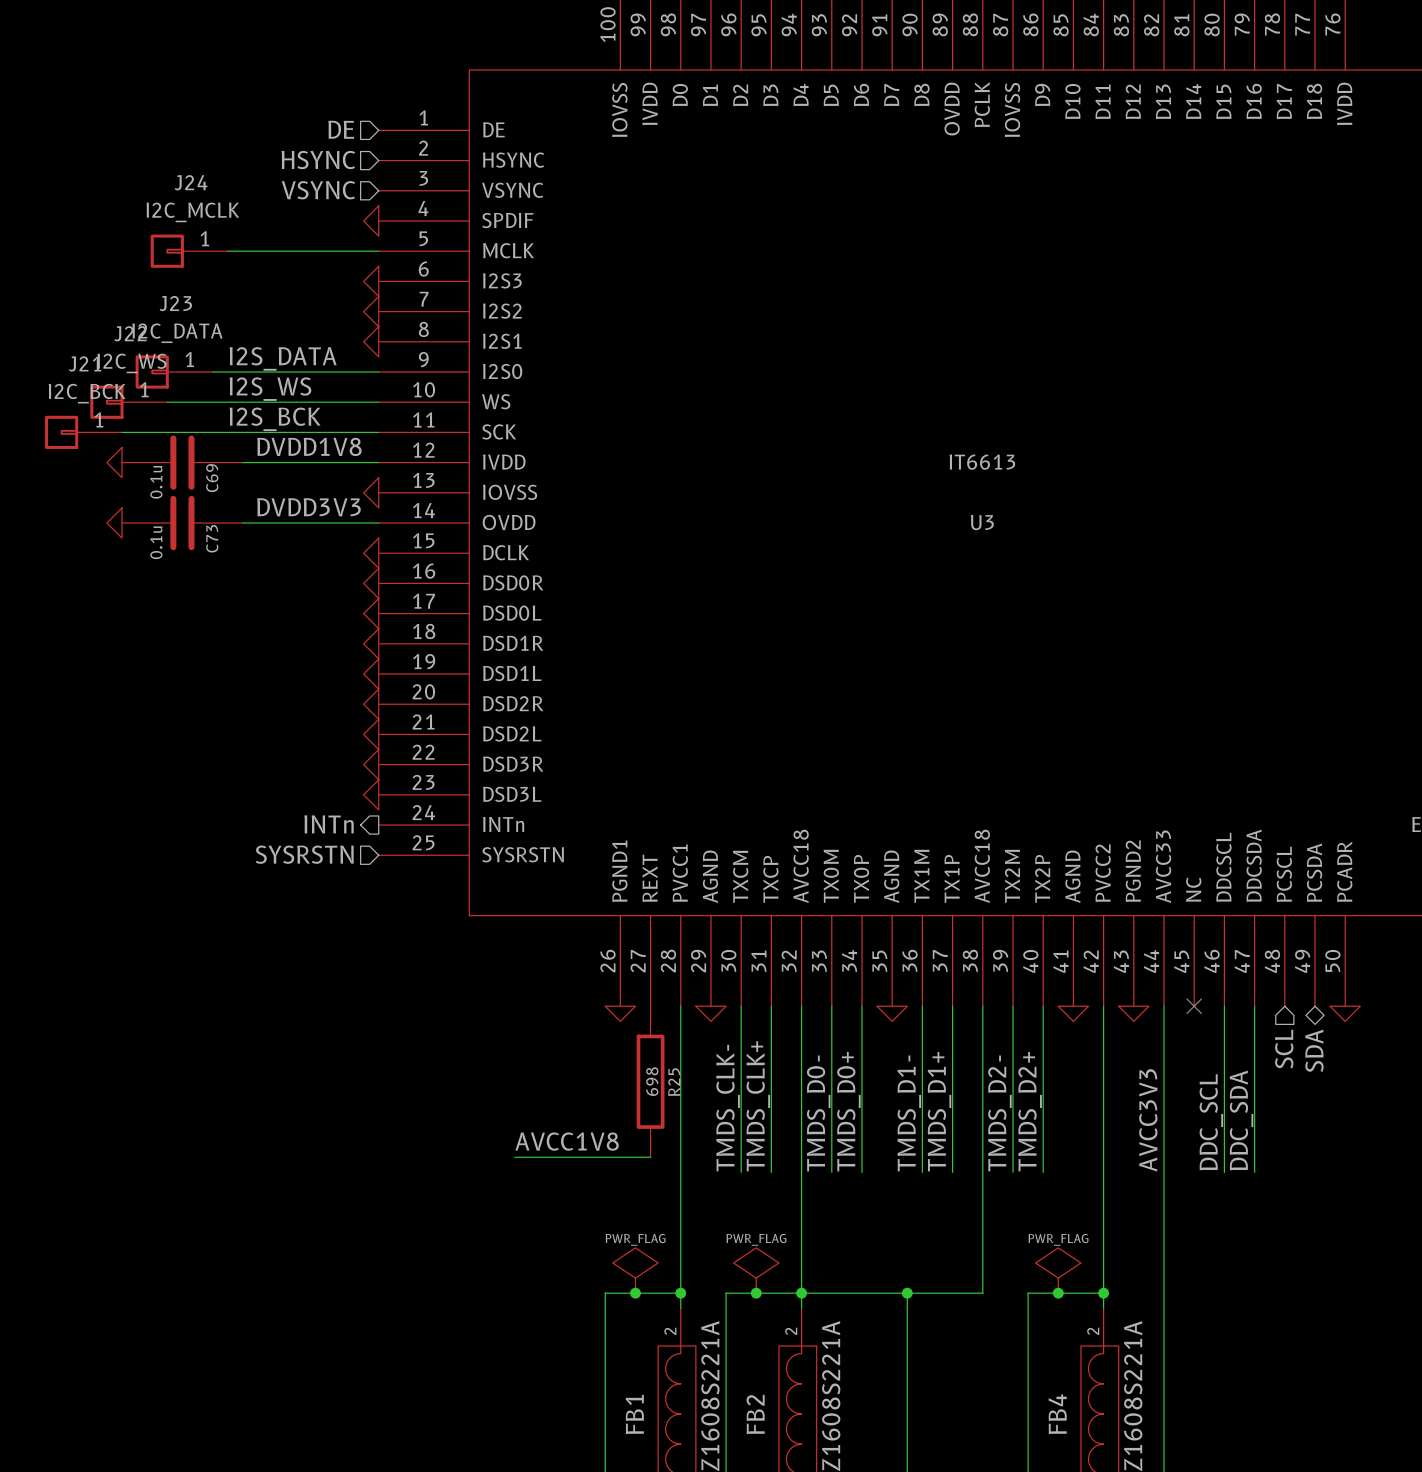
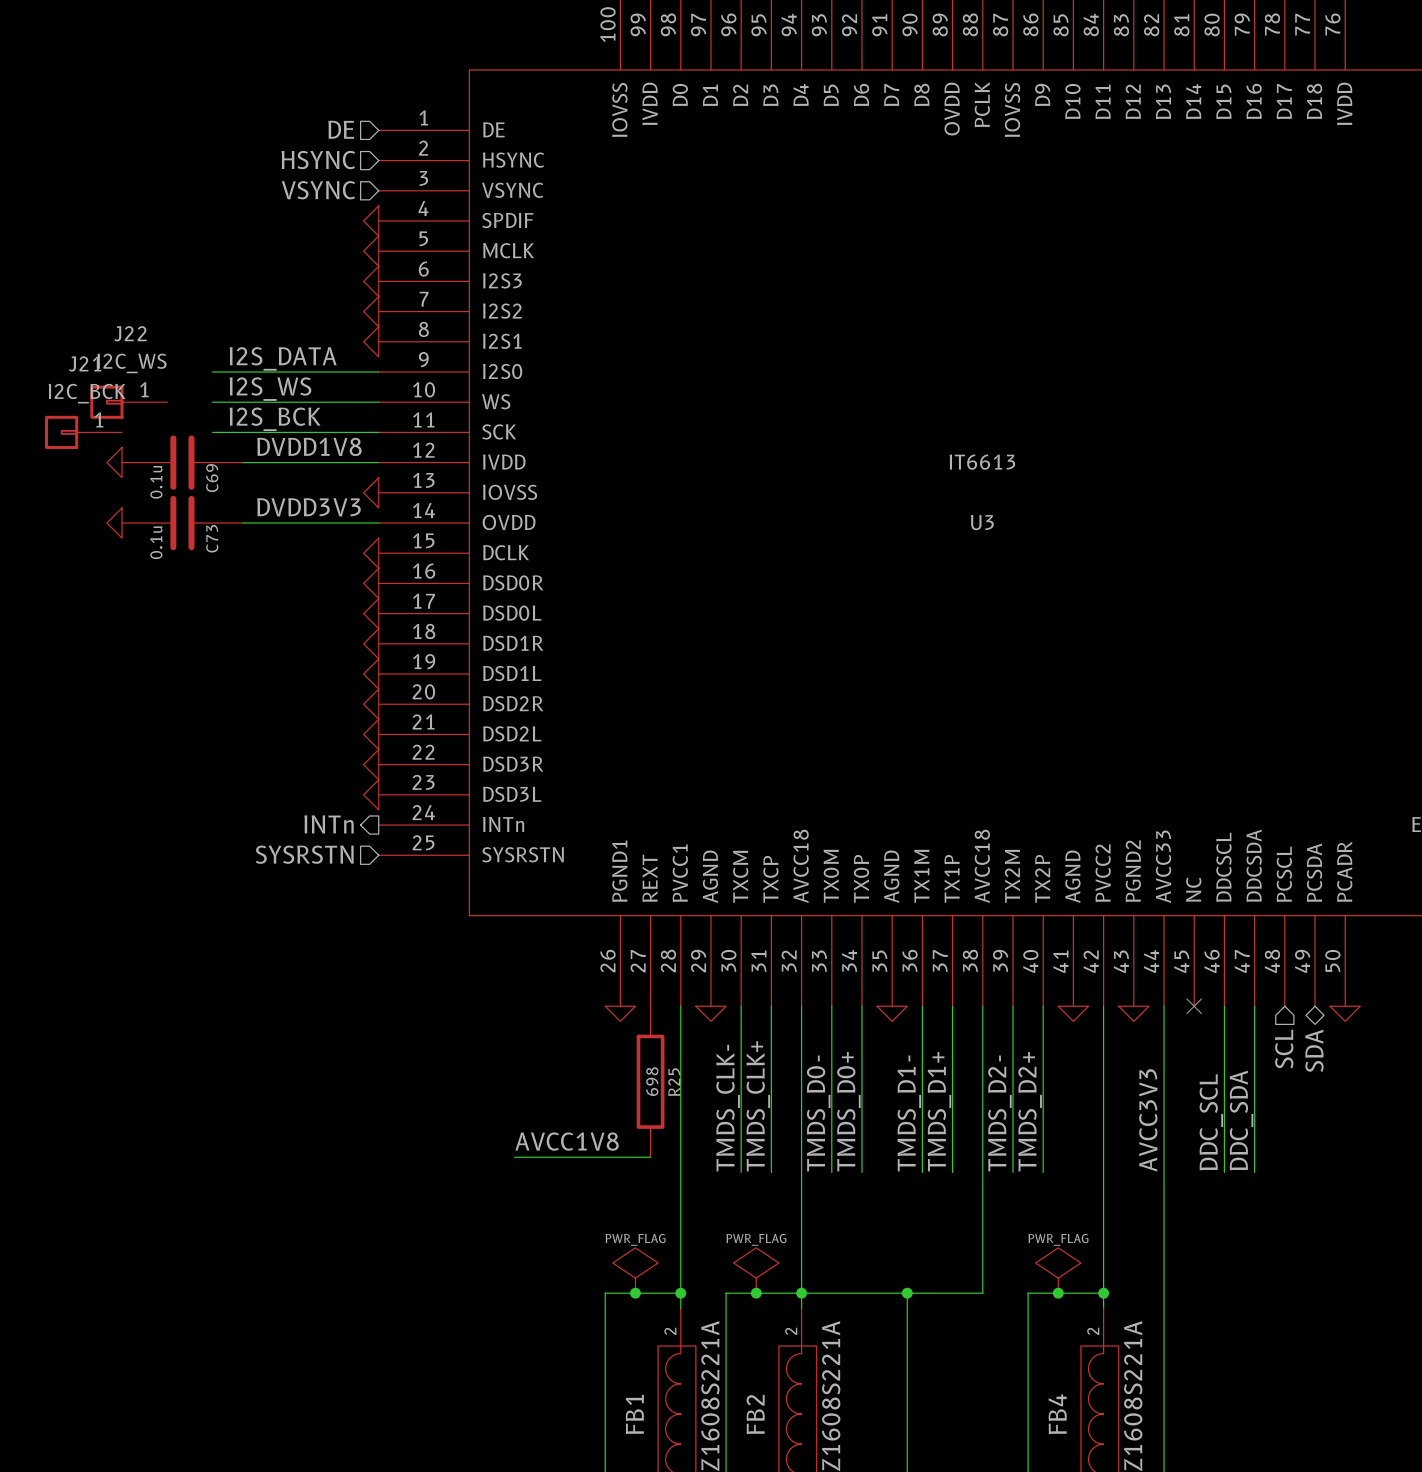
J24: I2C_MCLK (189, 251) -> none
wire: (227, 251) (378, 251) -> none
power symbol: none -> (371, 251)
J23: I2C_DATA (174, 372) -> none
wire: (167, 402) (212, 402) -> none
wire: (122, 432) (212, 432) -> none

